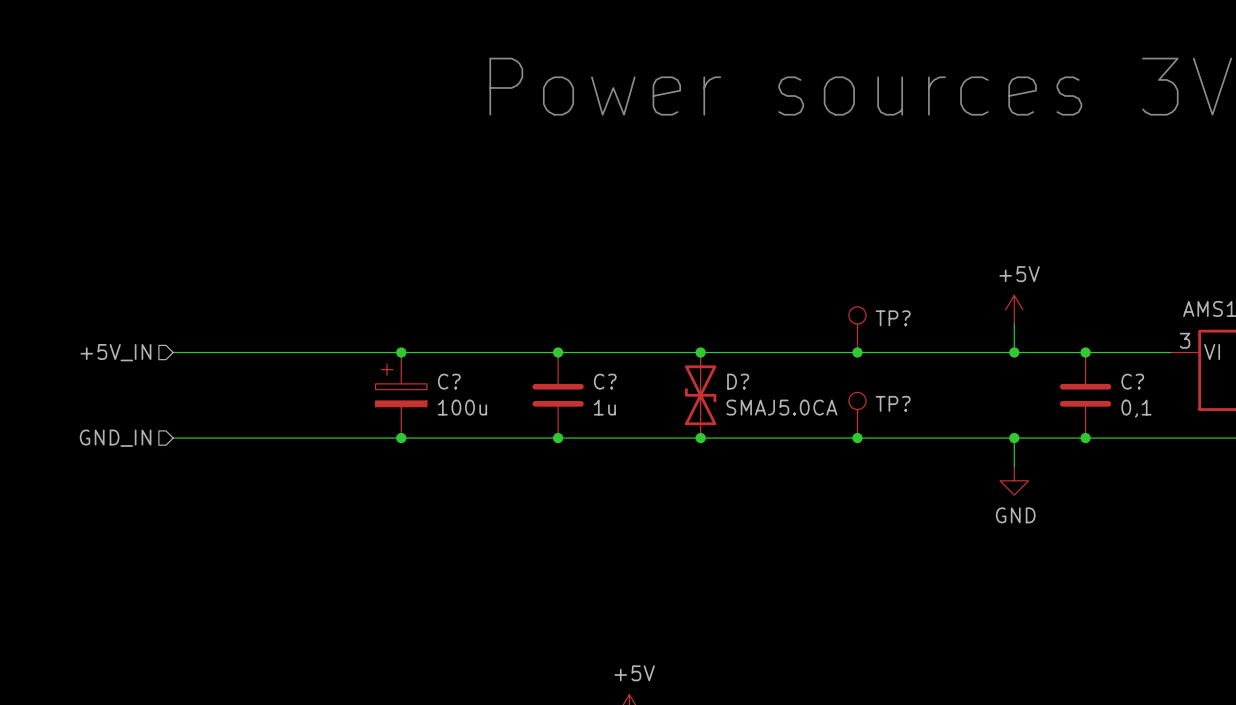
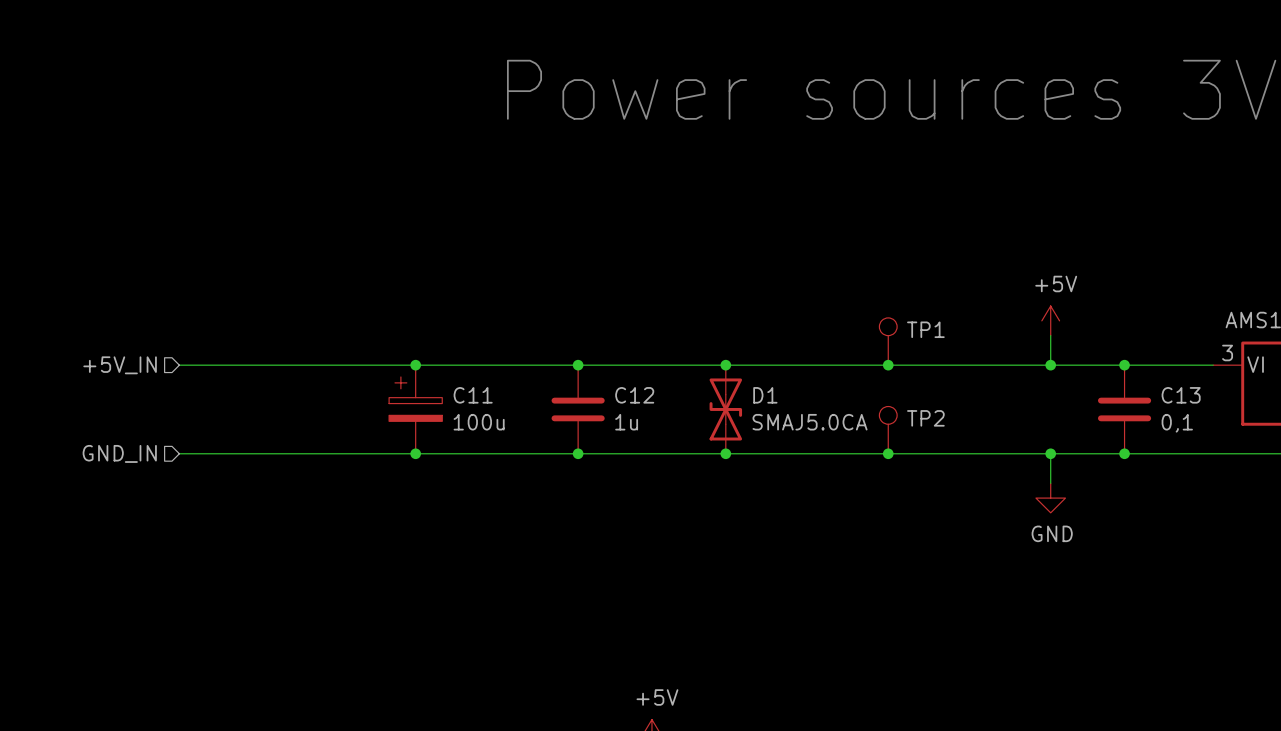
TP? name: TP? (893, 318) -> TP1 (925, 329)
C? name: C? (449, 381) -> C11 (473, 395)
C? name: C? (605, 381) -> C12 (634, 395)
D? name: D? (738, 381) -> D1 (765, 395)
C? name: C? (1132, 381) -> C13 (1181, 395)
TP? name: TP? (893, 403) -> TP2 (925, 418)

